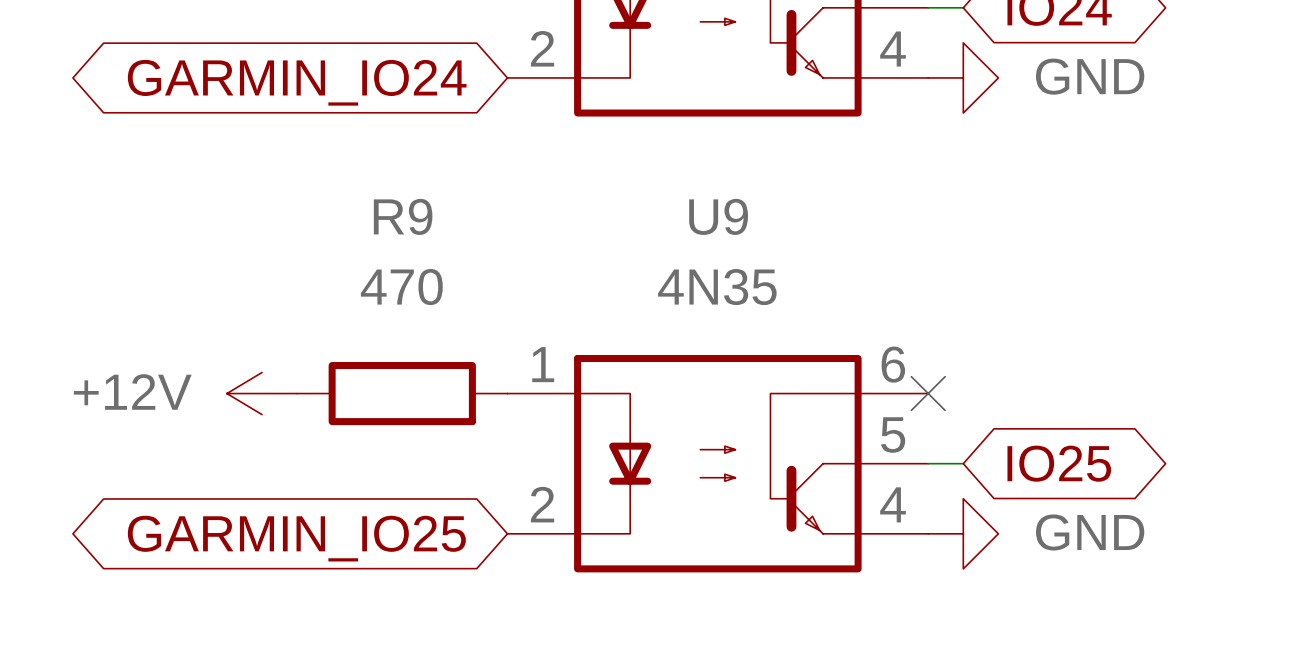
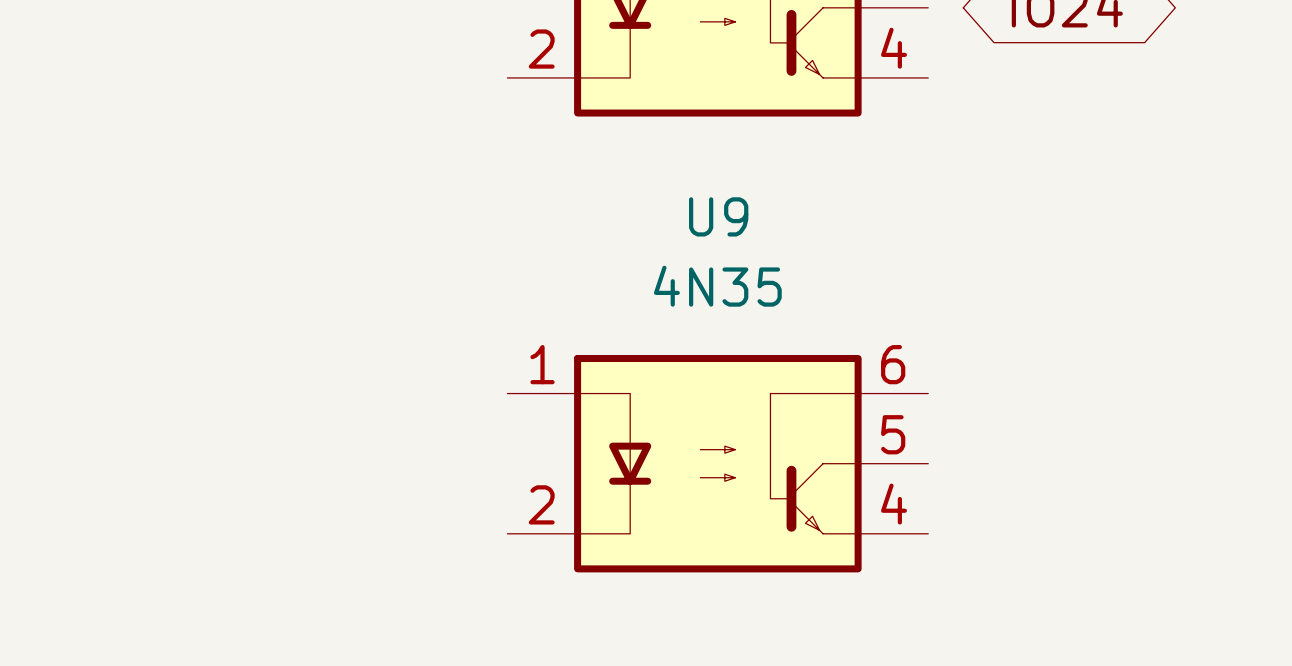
wire: (928, 7) (963, 7) -> none
power symbol: GND (963, 77) -> none
global label: GARMIN_IO24 (297, 82) -> none
power symbol: +12V (261, 393) -> none
R9: 470 (402, 393) -> none
no-connect mark: (928, 393) -> none
wire: (928, 463) (963, 463) -> none
global label: IO25 (1059, 463) -> none
power symbol: GND (963, 533) -> none
global label: GARMIN_IO25 (296, 538) -> none

